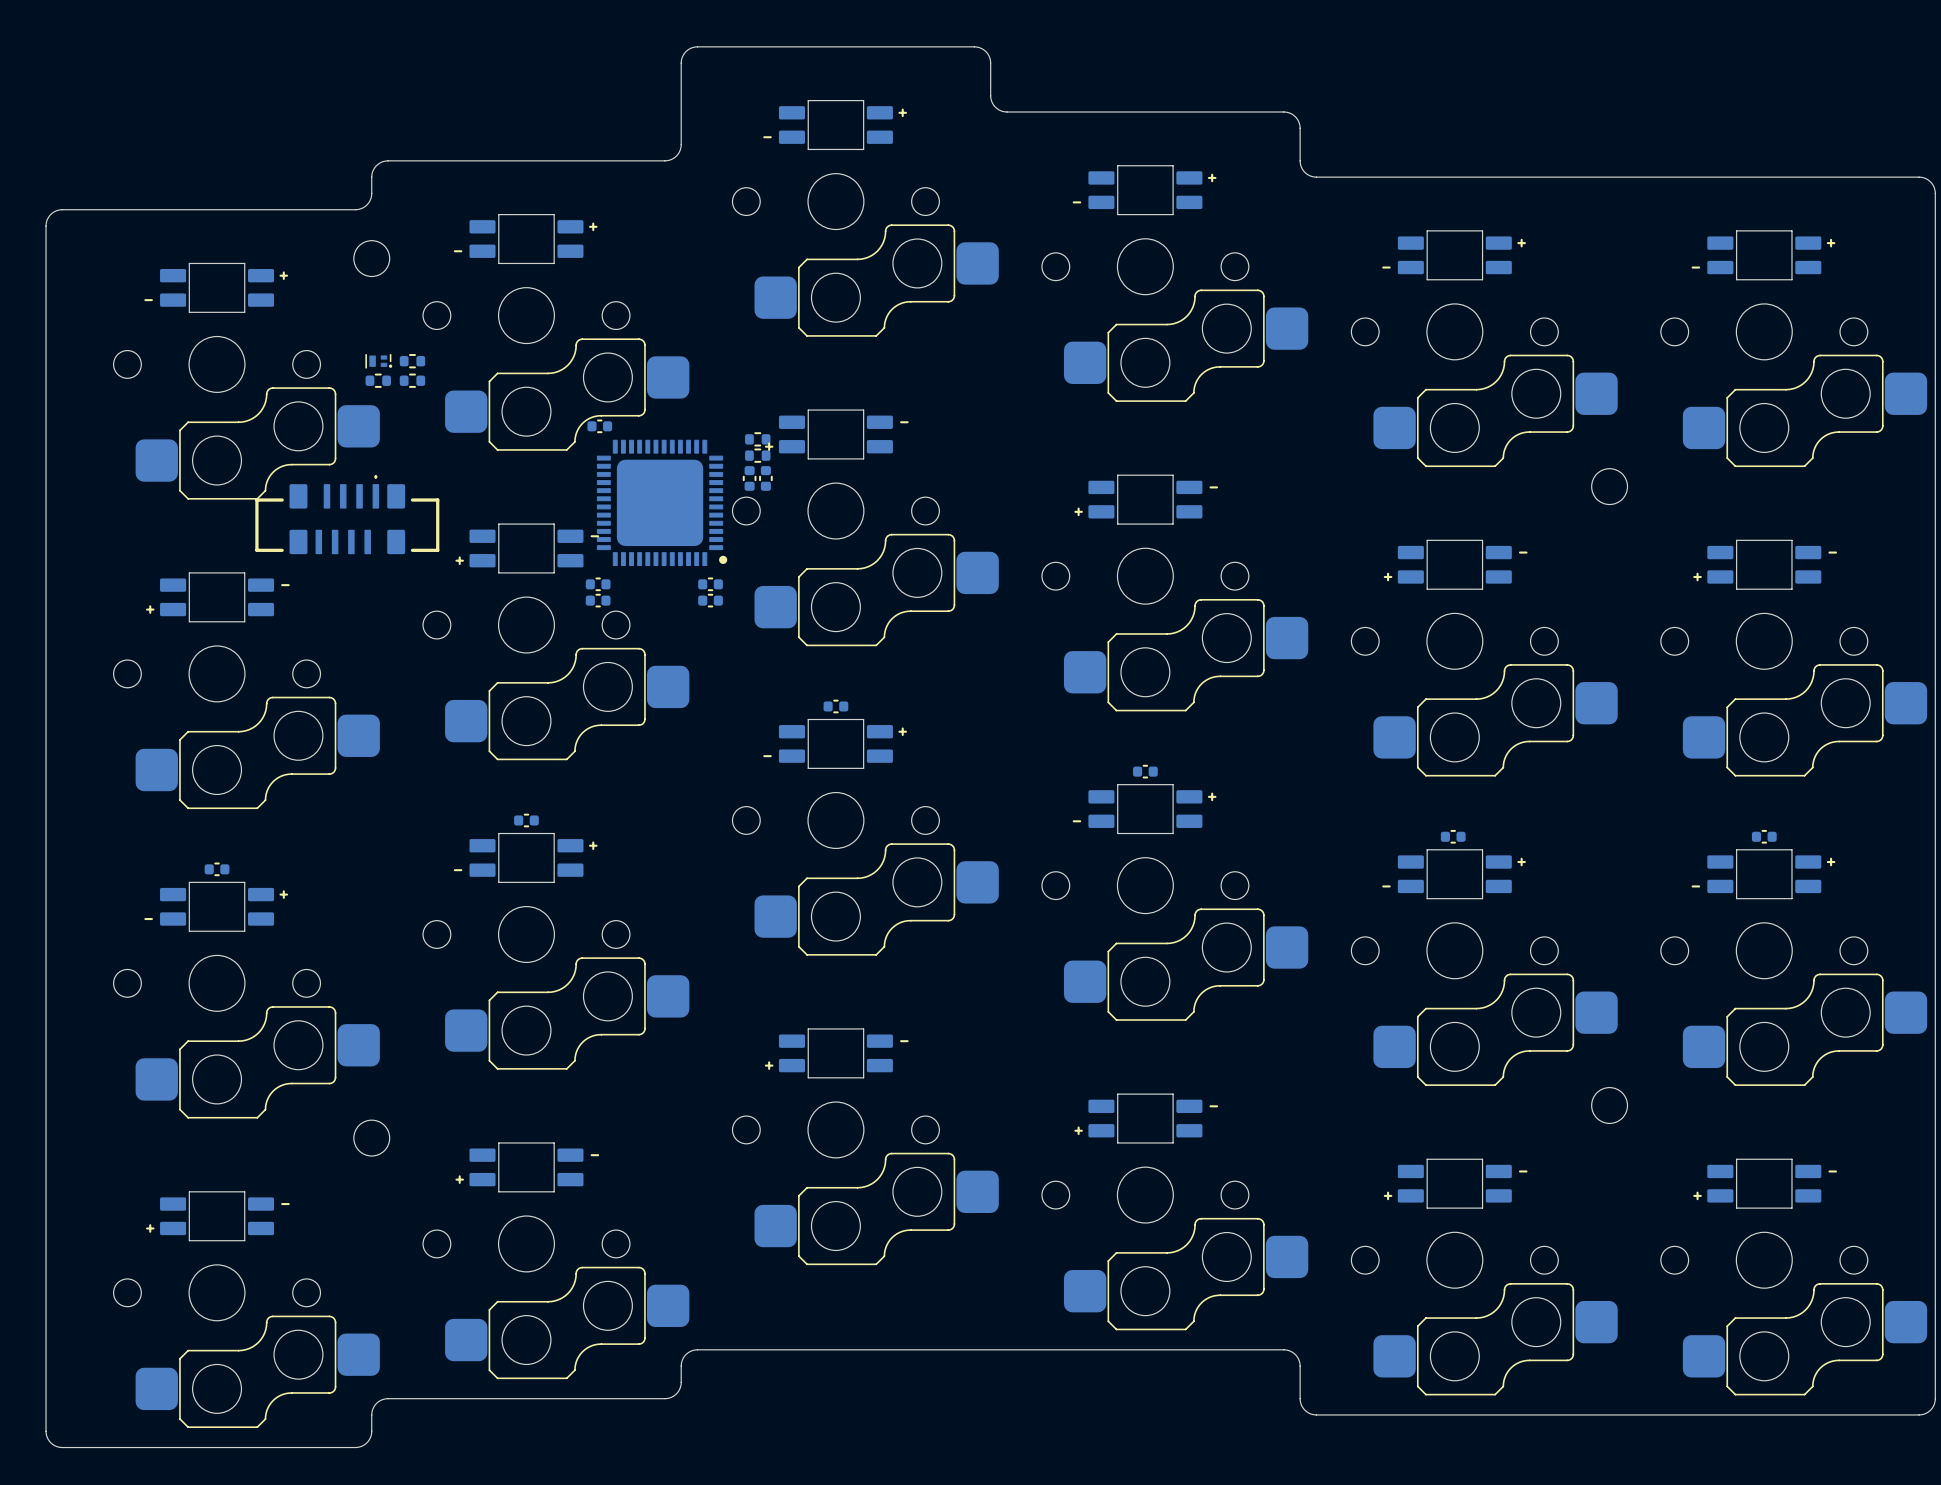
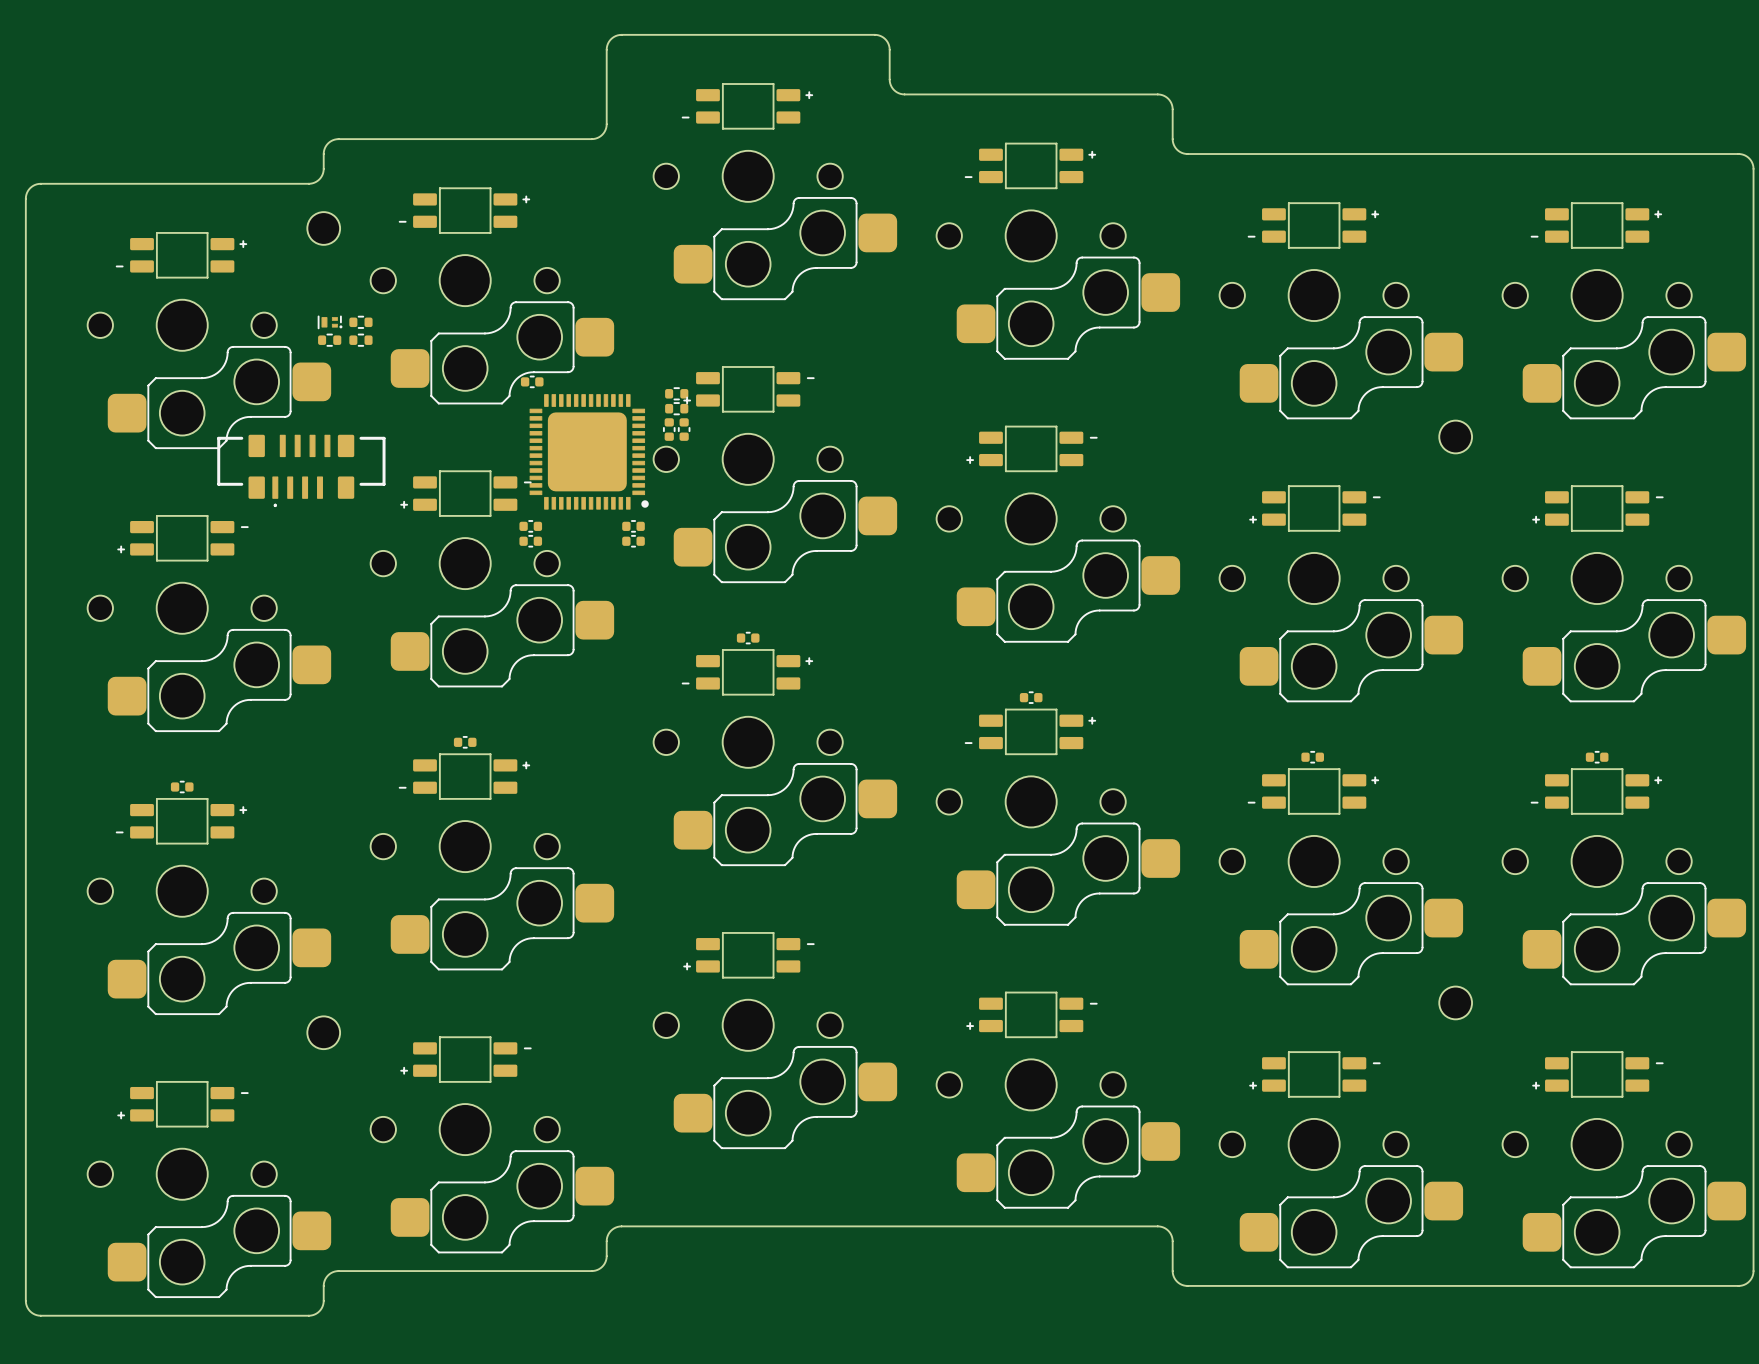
part rotation: 0° (347, 514) -> 180° (301, 470)

